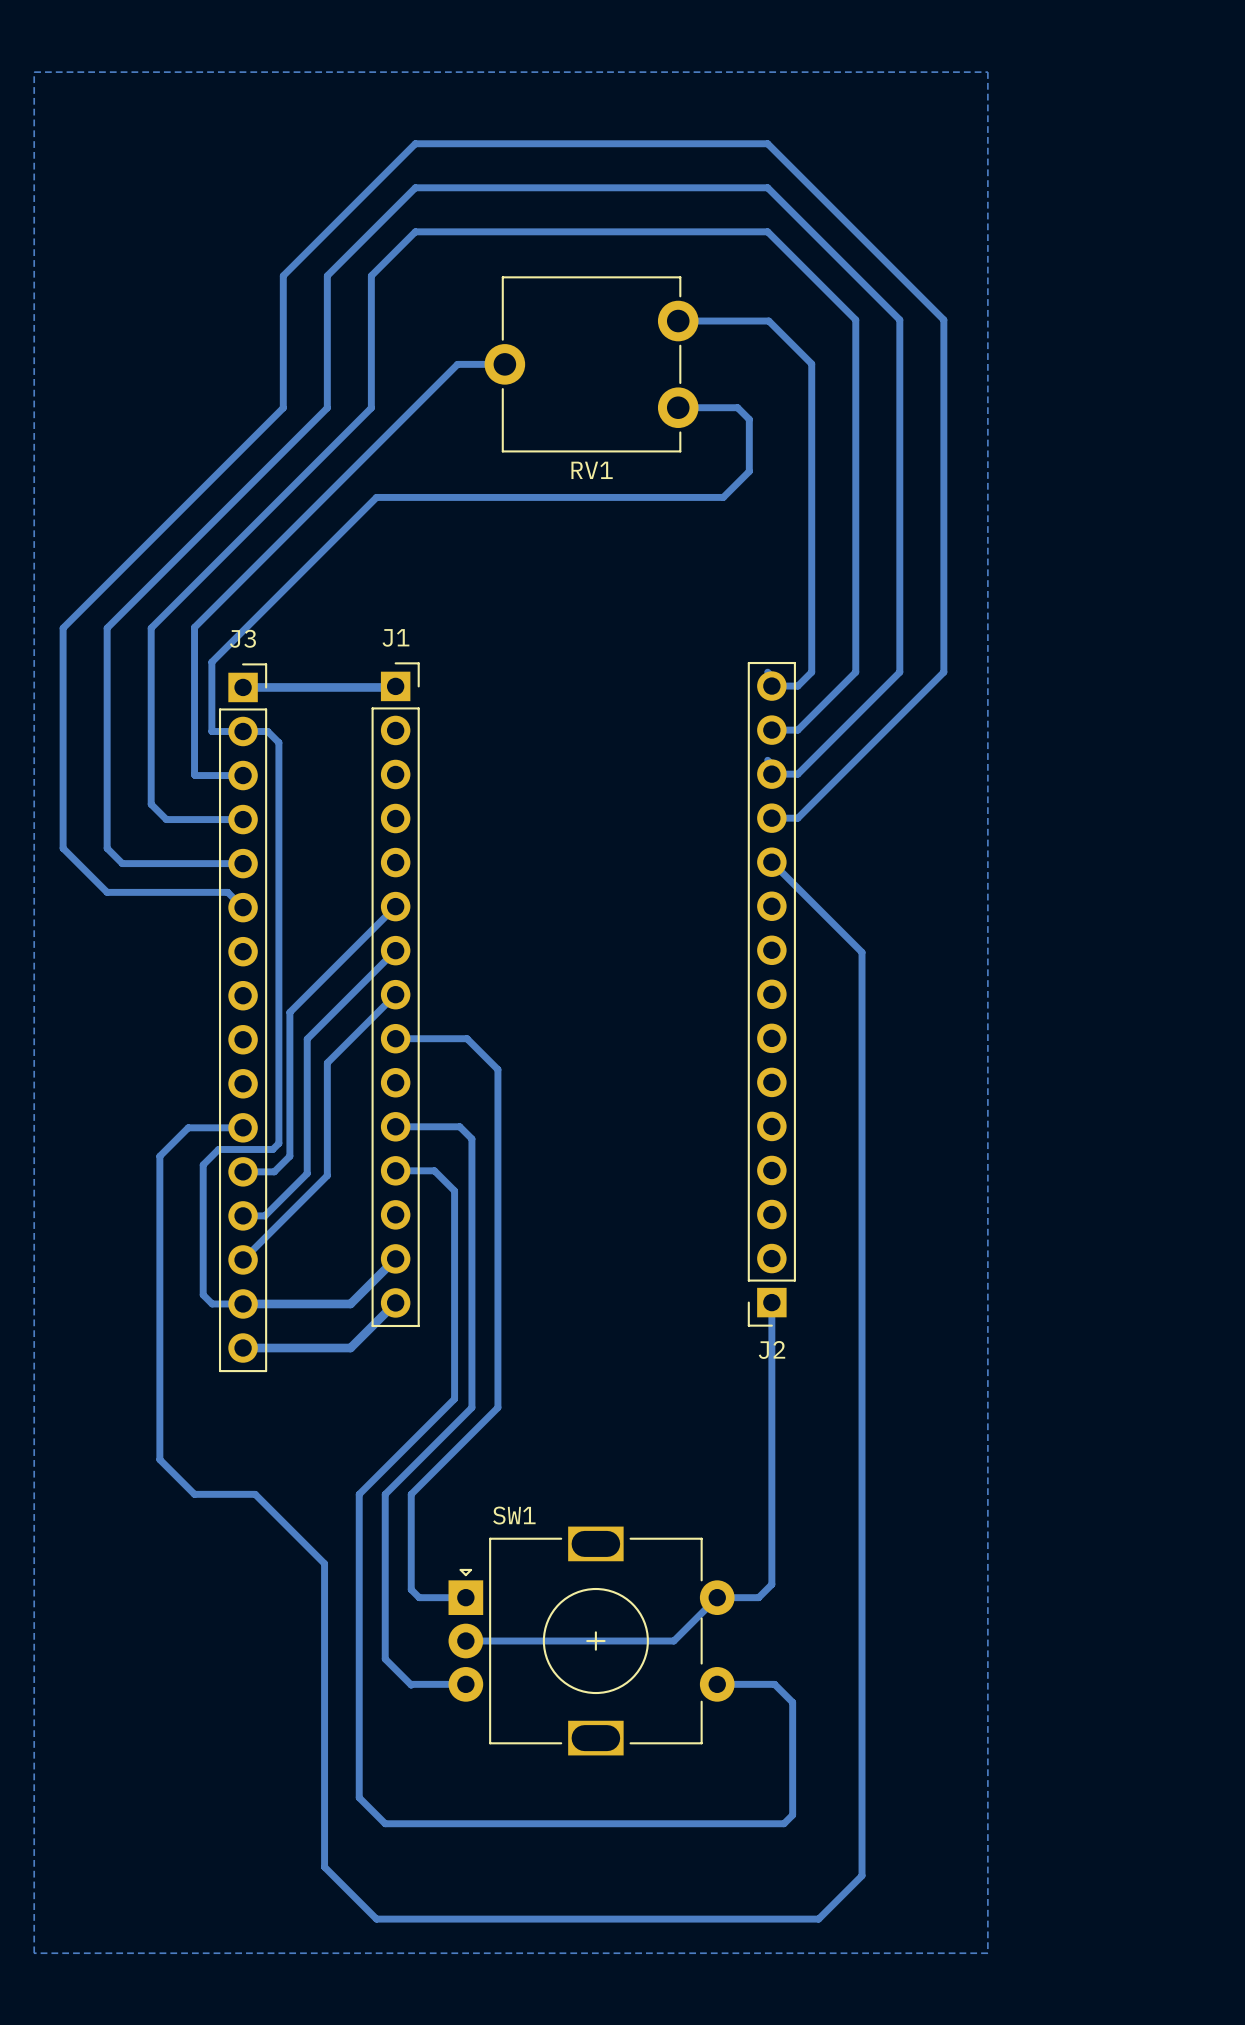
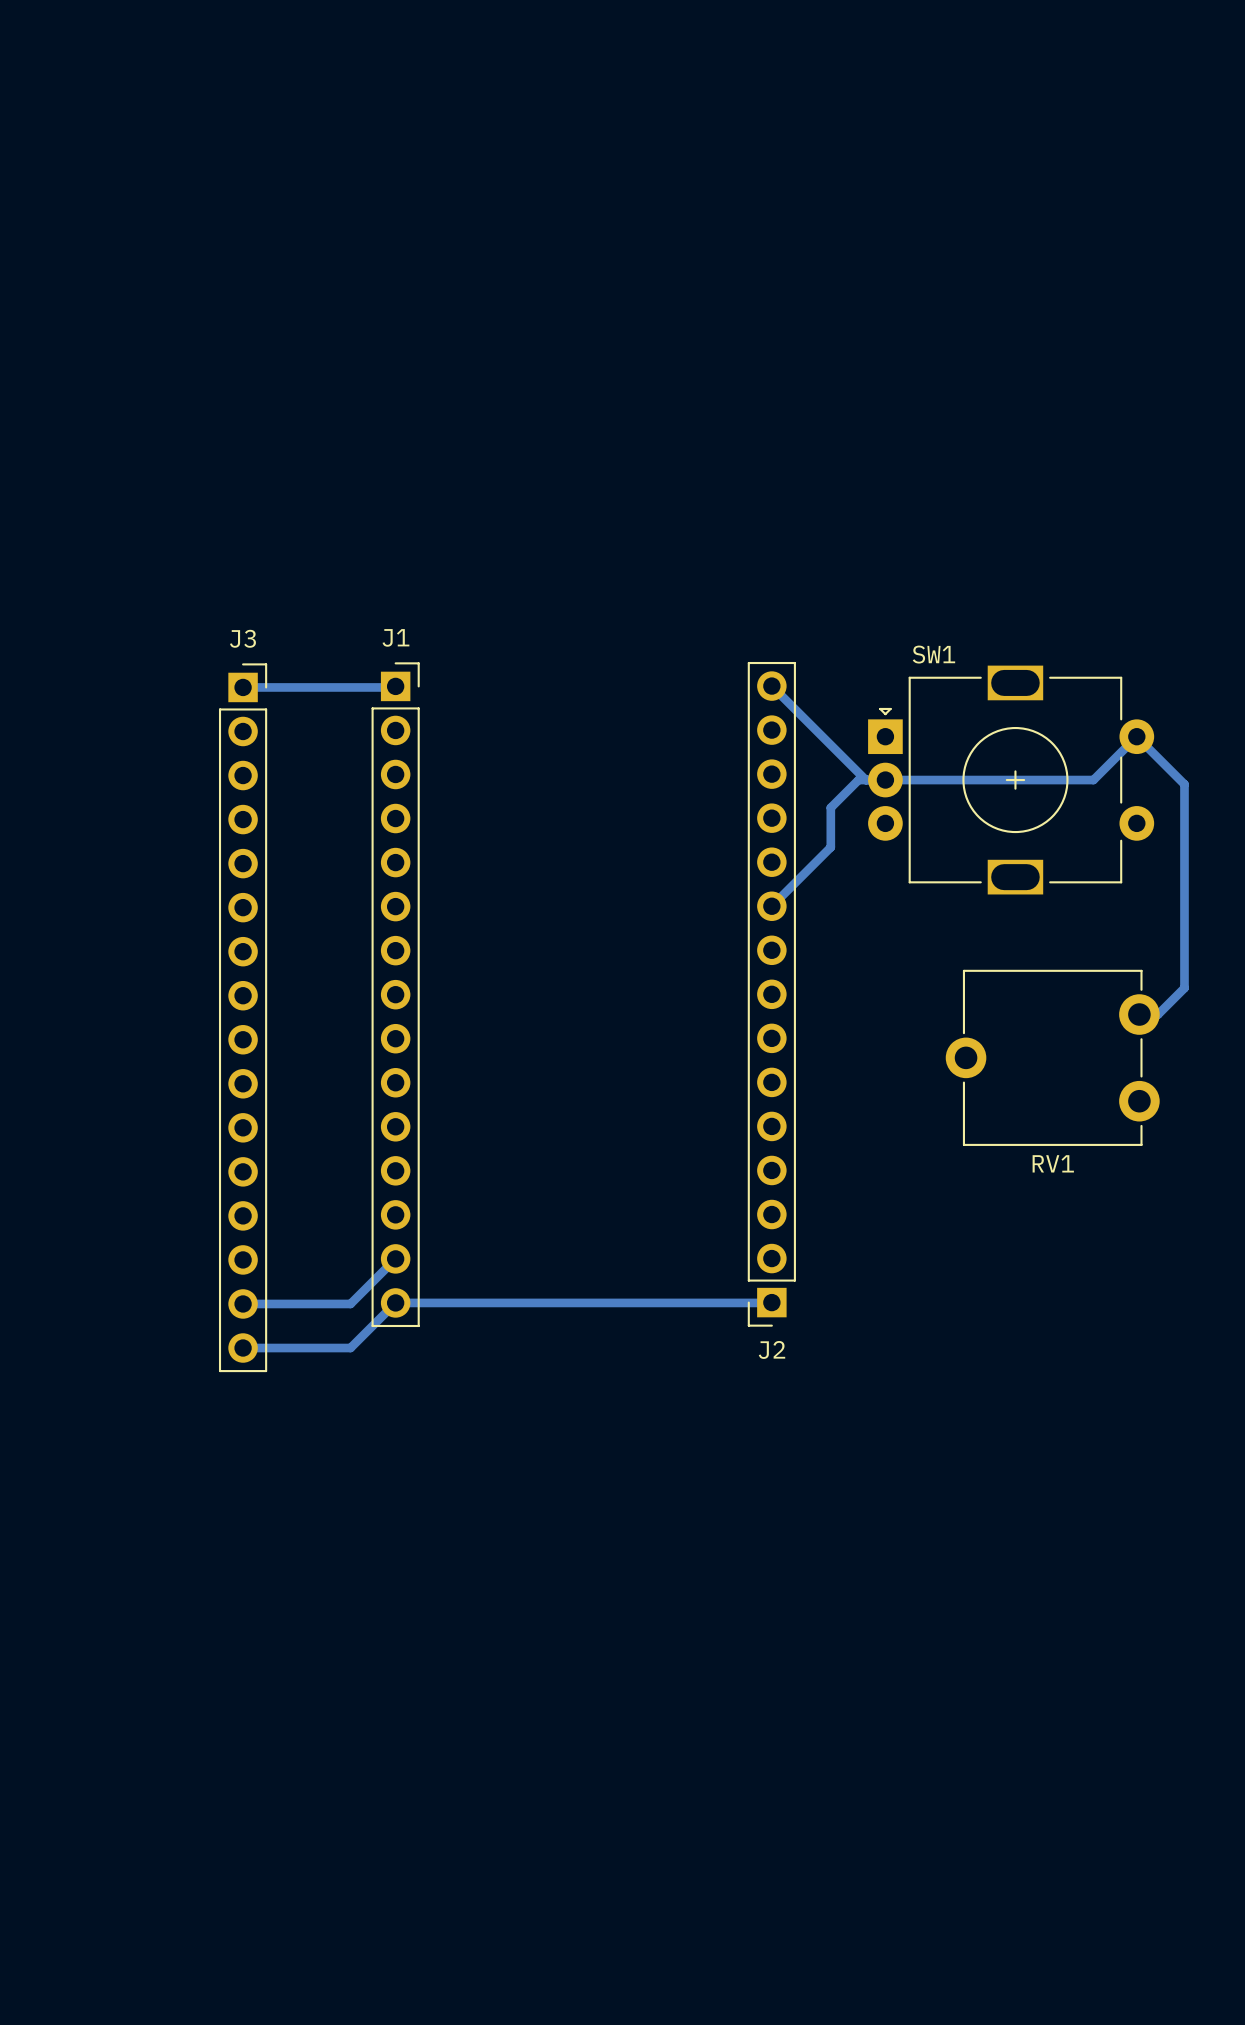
bottom zone outline: (34, 72) (34, 1953) (987, 1953) (987, 72) (34, 72) -> none
bottom track: (678, 321) (768, 321) (811, 363) (811, 672) (797, 686) (771, 686) (771, 676) (767, 672) -> none
bottom track: (504, 364) (457, 364) (194, 627) (194, 774) (243, 775) -> none
RV1 position: (591, 364) -> (1052, 1057)
bottom track: (678, 407) (737, 407) (749, 419) (749, 471) (723, 497) (376, 497) (211, 662) (211, 731) (267, 731) (278, 742) (278, 1143) (272, 1149) (218, 1149) (203, 1164) (203, 1294) (212, 1303) (243, 1303) -> none
bottom track: none -> (771, 686) (865, 780)
bottom track: (771, 730) (797, 730) (855, 672) (855, 319) (767, 231) (415, 231) (371, 275) (371, 407) (151, 628) (151, 804) (166, 819) (243, 819) -> none
bottom track: (767, 760) (771, 764) (771, 774) (797, 774) (899, 672) (899, 319) (767, 187) (415, 187) (327, 275) (327, 407) (107, 628) (107, 848) (122, 863) (243, 863) -> none
bottom track: (771, 818) (797, 818) (943, 672) (943, 319) (767, 143) (415, 143) (283, 275) (283, 407) (63, 628) (63, 848) (107, 892) (227, 892) (243, 907) -> none
bottom track: (771, 862) (862, 952) (862, 1875) (818, 1919) (376, 1919) (324, 1867) (324, 1563) (255, 1494) (194, 1494) (159, 1459) (159, 1156) (188, 1127) (243, 1127) -> none
bottom track: (395, 906) (289, 1012) (289, 1156) (274, 1171) (243, 1171) -> none
bottom track: none -> (771, 906) (830, 847) (830, 807) (858, 780) (1093, 780) (1136, 736) (1184, 784) (1184, 988) (1158, 1014) (1139, 1014)
bottom track: (395, 950) (307, 1039) (307, 1173) (264, 1215) (243, 1215) -> none
bottom track: (395, 994) (327, 1062) (327, 1175) (243, 1259) -> none
bottom track: (395, 1038) (467, 1038) (497, 1069) (497, 1407) (411, 1494) (411, 1589) (419, 1597) (465, 1597) -> none
bottom track: (395, 1126) (459, 1126) (471, 1138) (471, 1407) (385, 1494) (385, 1659) (411, 1685) (465, 1684) -> none
bottom track: (395, 1170) (434, 1170) (454, 1190) (454, 1398) (359, 1494) (359, 1797) (385, 1823) (784, 1823) (792, 1815) (792, 1702) (774, 1684) (717, 1684) -> none
bottom track: (771, 1302) (771, 1584) (758, 1597) (717, 1597) (673, 1641) (465, 1641) -> (771, 1302) (395, 1302)
SW1 position: (591, 1641) -> (1011, 780)

